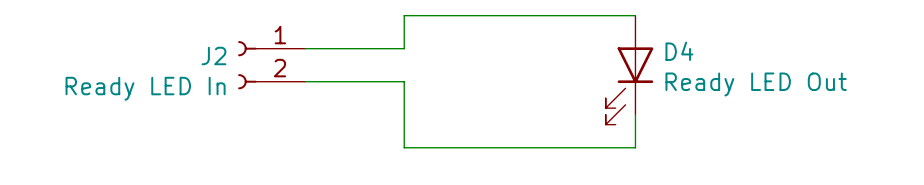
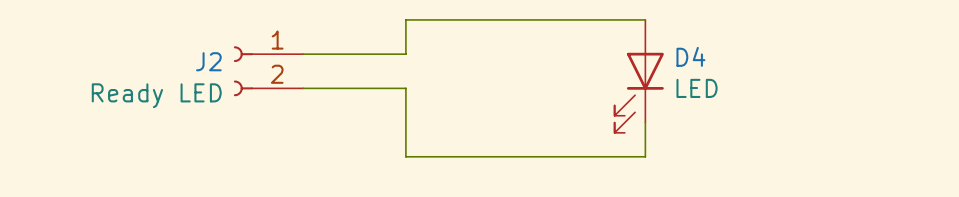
D4 value: Ready LED Out (756, 84) -> LED (697, 88)
J2 value: Ready LED In (145, 88) -> Ready LED (156, 95)

